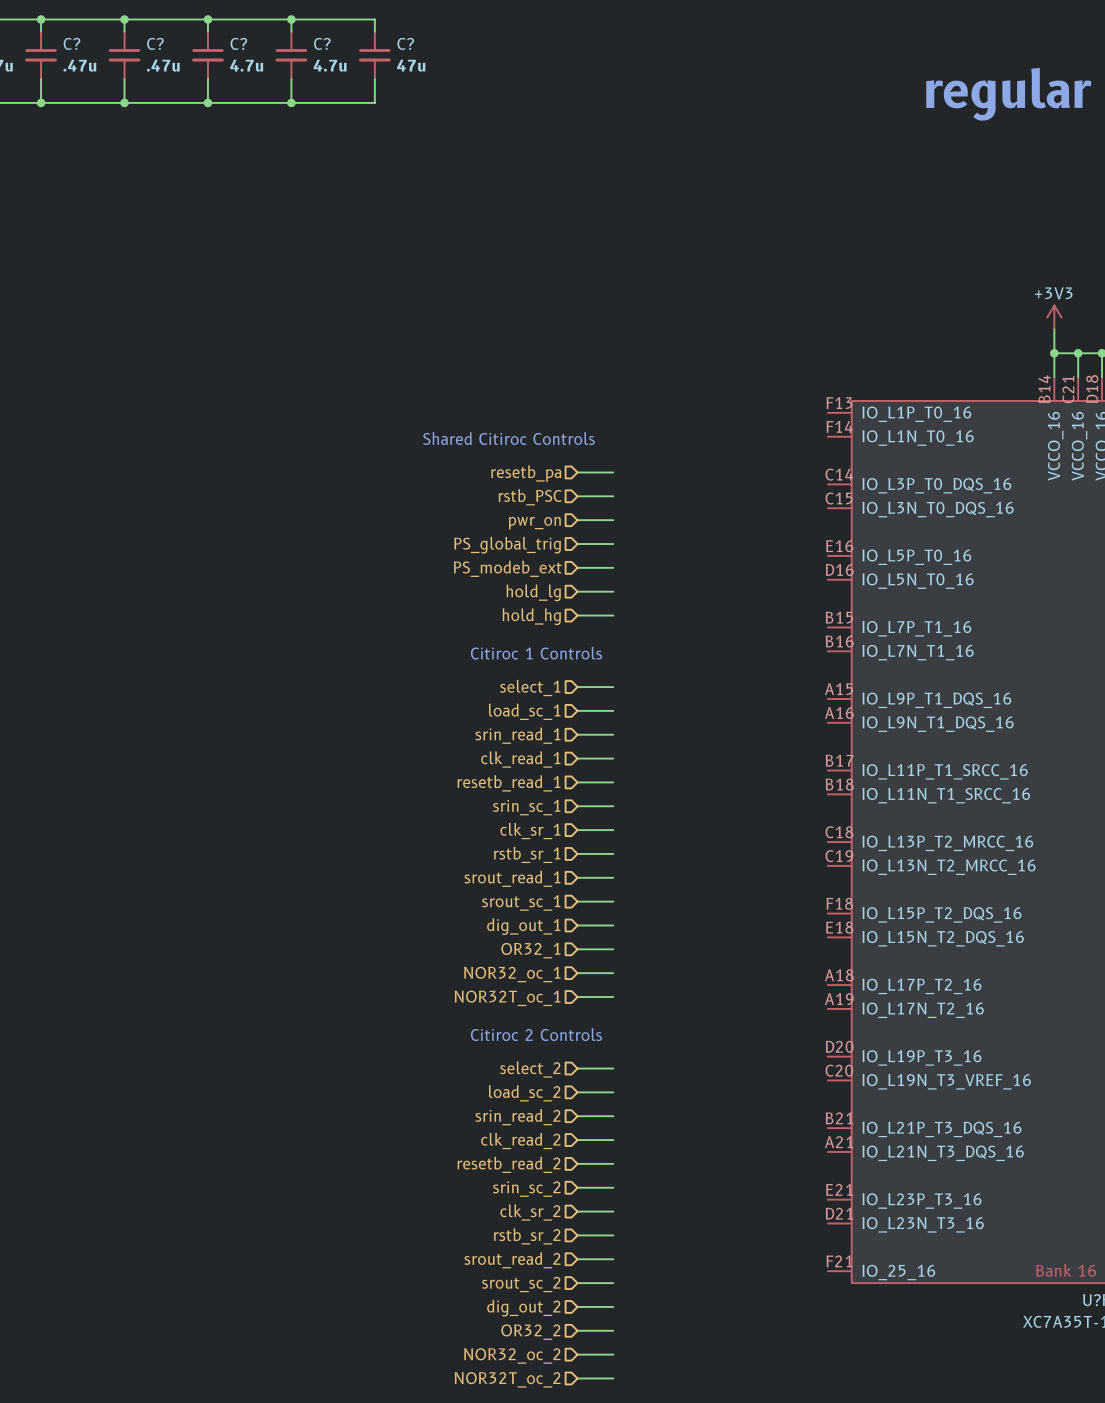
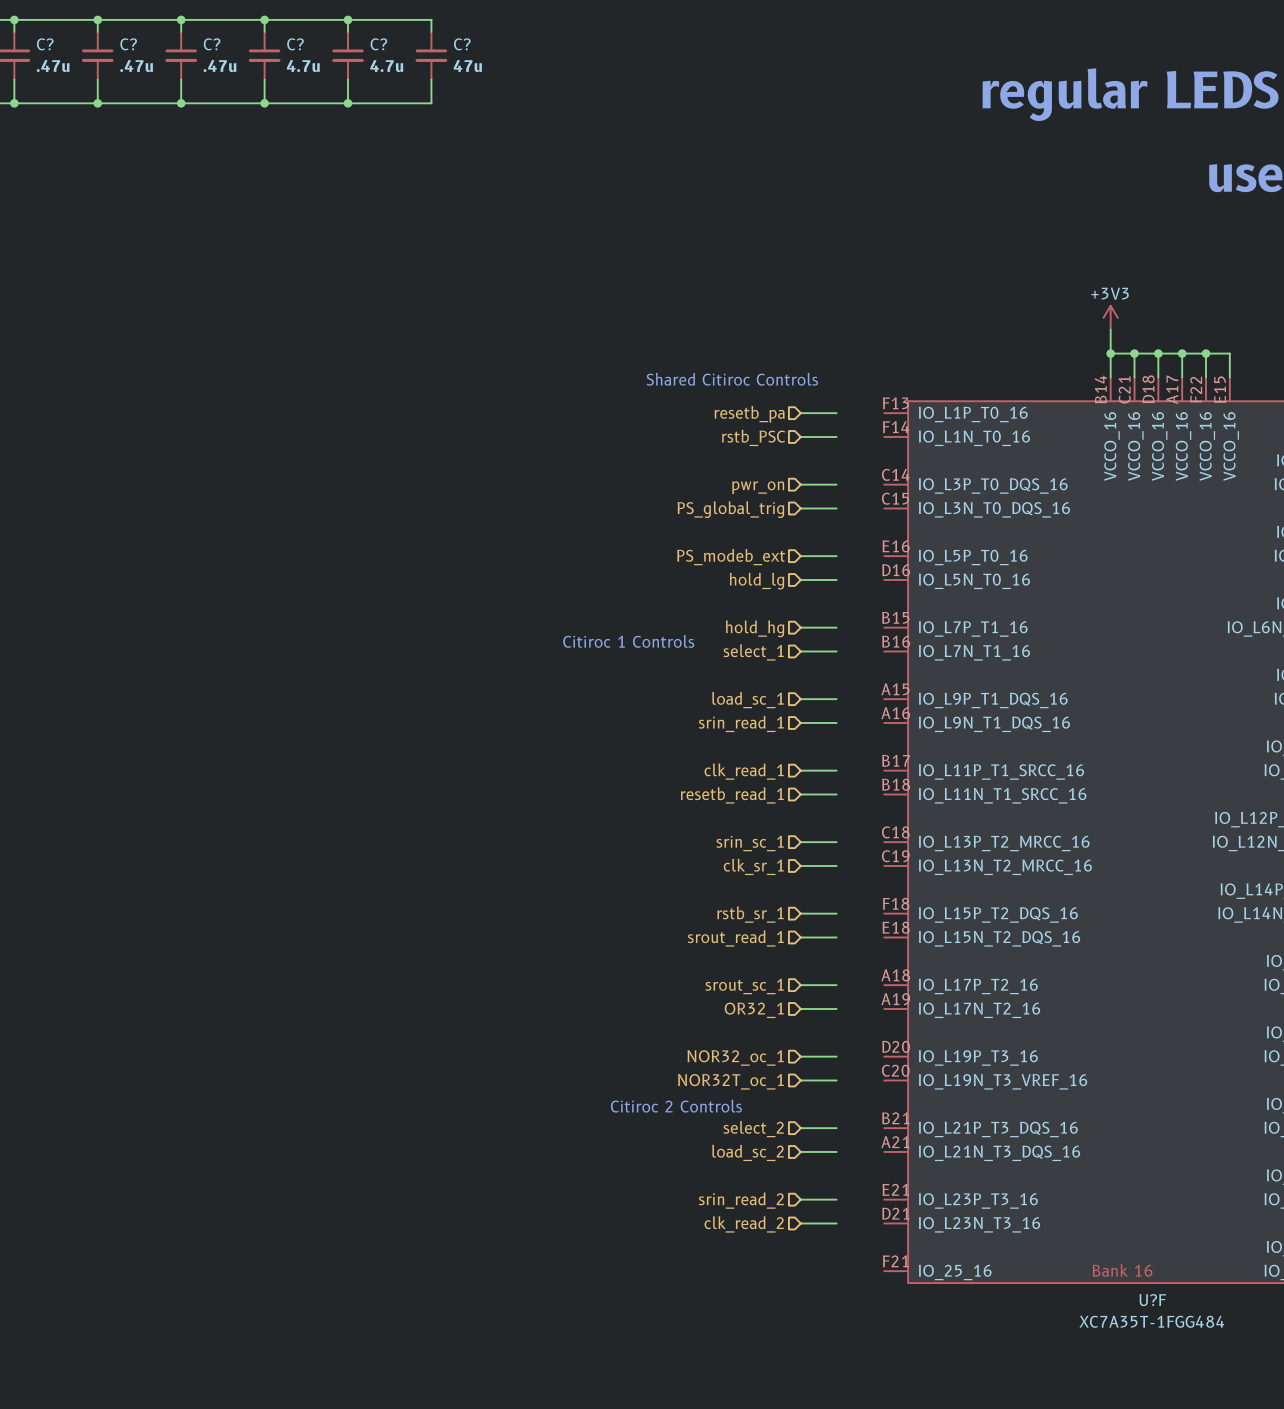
text position: Shared Citiroc Controls (508, 438) -> Shared Citiroc Controls (732, 379)
wire: (577, 472) (613, 472) -> (800, 413) (836, 413)
hierarchical label position: resetb_pa (526, 473) -> resetb_pa (749, 414)
wire: (577, 496) (613, 496) -> (800, 436) (836, 436)
hierarchical label position: rstb_PSC (530, 497) -> rstb_PSC (753, 437)
wire: (577, 520) (613, 520) -> none
hierarchical label position: pwr_on (534, 523) -> pwr_on (758, 487)
wire: (577, 544) (613, 544) -> (800, 484) (836, 484)
hierarchical label position: PS_global_trig (507, 545) -> PS_global_trig (730, 509)
wire: (577, 567) (613, 567) -> (800, 508) (836, 508)
hierarchical label position: PS_modeb_ext (507, 568) -> PS_modeb_ext (731, 557)
wire: (577, 591) (613, 591) -> none
hierarchical label position: hold_lg (533, 592) -> hold_lg (757, 581)
wire: (577, 615) (613, 615) -> (800, 556) (836, 556)
hierarchical label position: hold_hg (531, 616) -> hold_hg (755, 628)
text position: Citiroc 1 Controls (536, 653) -> Citiroc 1 Controls (628, 641)
wire: (577, 687) (613, 687) -> (800, 627) (836, 627)
hierarchical label position: select_1 (530, 688) -> select_1 (753, 652)
wire: (577, 710) (613, 710) -> (800, 651) (836, 651)
hierarchical label position: load_sc_1 (524, 711) -> load_sc_1 (748, 700)
wire: (577, 734) (613, 734) -> (800, 579) (836, 579)
hierarchical label position: srin_read_1 (517, 735) -> srin_read_1 (741, 723)
wire: (577, 758) (613, 758) -> (800, 699) (836, 699)
hierarchical label position: clk_read_1 (520, 759) -> clk_read_1 (744, 771)
wire: (577, 782) (613, 782) -> (800, 722) (836, 722)
hierarchical label position: resetb_read_1 (509, 783) -> resetb_read_1 (732, 795)
wire: (577, 806) (613, 806) -> none
hierarchical label position: srin_sc_1 (526, 807) -> srin_sc_1 (750, 843)
wire: (577, 830) (613, 830) -> (800, 770) (836, 770)
hierarchical label position: clk_sr_1 (530, 831) -> clk_sr_1 (753, 866)
wire: (577, 853) (613, 853) -> (800, 794) (836, 794)
hierarchical label position: rstb_sr_1 (527, 854) -> rstb_sr_1 (750, 914)
wire: (577, 877) (613, 877) -> none
hierarchical label position: srout_read_1 (512, 878) -> srout_read_1 (735, 938)
wire: (577, 901) (613, 901) -> (800, 842) (836, 842)
hierarchical label position: srout_sc_1 (521, 902) -> srout_sc_1 (744, 986)
wire: (577, 925) (613, 925) -> (800, 865) (836, 865)
hierarchical label: dig_out_1 (523, 926) -> none
wire: (577, 949) (613, 949) -> none
hierarchical label position: OR32_1 (530, 950) -> OR32_1 (754, 1010)
wire: (577, 973) (613, 973) -> (800, 913) (836, 913)
hierarchical label position: NOR32_oc_1 (512, 974) -> NOR32_oc_1 (735, 1057)
wire: (577, 997) (613, 997) -> (800, 937) (836, 937)
hierarchical label position: NOR32T_oc_1 (507, 998) -> NOR32T_oc_1 (730, 1081)
text position: Citiroc 2 Controls (536, 1034) -> Citiroc 2 Controls (676, 1106)
wire: (577, 1068) (613, 1068) -> (800, 1008) (836, 1008)
hierarchical label position: select_2 (530, 1069) -> select_2 (753, 1129)
wire: (577, 1092) (613, 1092) -> (800, 985) (836, 985)
hierarchical label position: load_sc_2 (524, 1093) -> load_sc_2 (748, 1152)
wire: (577, 1116) (613, 1116) -> (800, 1056) (836, 1056)
hierarchical label position: srin_read_2 (517, 1117) -> srin_read_2 (741, 1200)
wire: (577, 1140) (613, 1140) -> (800, 1080) (836, 1080)
hierarchical label position: clk_read_2 (520, 1141) -> clk_read_2 (744, 1224)
wire: (577, 1163) (613, 1163) -> none
hierarchical label: resetb_read_2 (509, 1164) -> none
wire: (577, 1187) (613, 1187) -> (800, 1128) (836, 1128)
hierarchical label: srin_sc_2 (526, 1189) -> none
wire: (577, 1211) (613, 1211) -> (800, 1151) (836, 1151)
hierarchical label: clk_sr_2 (530, 1212) -> none
wire: (577, 1235) (613, 1235) -> none
hierarchical label: rstb_sr_2 (527, 1236) -> none
wire: (577, 1259) (613, 1259) -> (800, 1199) (836, 1199)
hierarchical label: srout_read_2 (512, 1260) -> none
wire: (577, 1283) (613, 1283) -> (800, 1223) (836, 1223)
hierarchical label: srout_sc_2 (521, 1284) -> none
wire: (577, 1306) (613, 1306) -> none
hierarchical label: dig_out_2 (523, 1308) -> none
wire: (577, 1330) (613, 1330) -> none
hierarchical label: OR32_2 (530, 1332) -> none
wire: (577, 1354) (613, 1354) -> none
hierarchical label: NOR32_oc_2 (512, 1355) -> none
wire: (577, 1378) (613, 1378) -> none
hierarchical label: NOR32T_oc_2 (507, 1379) -> none

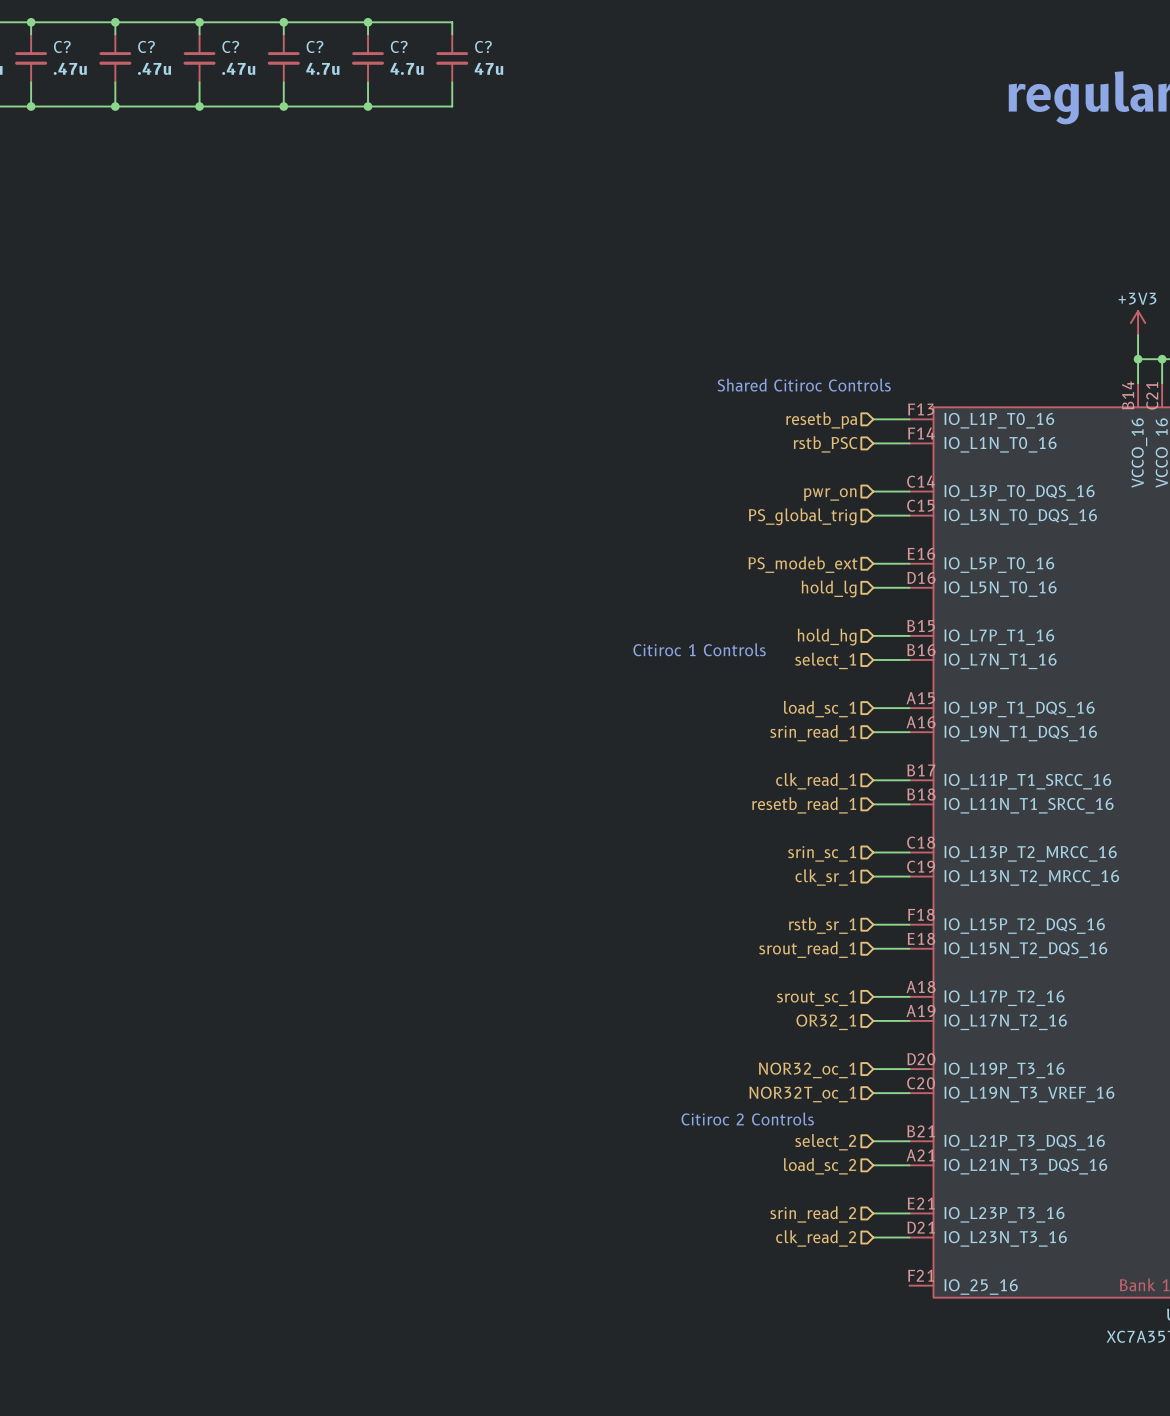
text position: Shared Citiroc Controls (732, 379) -> Shared Citiroc Controls (804, 385)
wire: (800, 413) (836, 413) -> (873, 419) (909, 419)
hierarchical label position: resetb_pa (749, 414) -> resetb_pa (821, 420)
wire: (800, 436) (836, 436) -> (873, 443) (909, 443)
hierarchical label position: rstb_PSC (753, 437) -> rstb_PSC (825, 444)
wire: (800, 484) (836, 484) -> (873, 491) (909, 491)
hierarchical label position: pwr_on (758, 487) -> pwr_on (830, 494)
wire: (800, 508) (836, 508) -> (873, 515) (909, 515)
hierarchical label position: PS_global_trig (730, 509) -> PS_global_trig (802, 516)
wire: (800, 556) (836, 556) -> (873, 563) (909, 563)
hierarchical label position: PS_modeb_ext (731, 557) -> PS_modeb_ext (802, 564)
wire: (800, 579) (836, 579) -> (873, 587) (909, 587)
hierarchical label position: hold_lg (757, 581) -> hold_lg (829, 588)
wire: (800, 627) (836, 627) -> (873, 635) (909, 635)
hierarchical label position: hold_hg (755, 628) -> hold_hg (827, 637)
text position: Citiroc 1 Controls (628, 641) -> Citiroc 1 Controls (699, 649)
wire: (800, 651) (836, 651) -> (873, 659) (909, 659)
hierarchical label position: select_1 (753, 652) -> select_1 (825, 660)
wire: (800, 699) (836, 699) -> (873, 708) (909, 708)
hierarchical label position: load_sc_1 (748, 700) -> load_sc_1 (820, 709)
wire: (800, 722) (836, 722) -> (873, 732) (909, 732)
hierarchical label position: srin_read_1 (741, 723) -> srin_read_1 (813, 733)
wire: (800, 770) (836, 770) -> (873, 780) (909, 780)
hierarchical label position: clk_read_1 (744, 771) -> clk_read_1 (816, 781)
wire: (800, 794) (836, 794) -> (873, 804) (909, 804)
hierarchical label position: resetb_read_1 (732, 795) -> resetb_read_1 (804, 805)
wire: (800, 842) (836, 842) -> (873, 852) (909, 852)
hierarchical label position: srin_sc_1 (750, 843) -> srin_sc_1 (822, 853)
wire: (800, 865) (836, 865) -> (873, 876) (909, 876)
hierarchical label position: clk_sr_1 (753, 866) -> clk_sr_1 (825, 877)
wire: (800, 913) (836, 913) -> (873, 924) (909, 924)
hierarchical label position: rstb_sr_1 (750, 914) -> rstb_sr_1 (822, 925)
wire: (800, 937) (836, 937) -> (873, 948) (909, 948)
hierarchical label position: srout_read_1 (735, 938) -> srout_read_1 (807, 949)
wire: (800, 985) (836, 985) -> (873, 996) (909, 996)
hierarchical label position: srout_sc_1 (744, 986) -> srout_sc_1 (816, 998)
wire: (800, 1008) (836, 1008) -> (873, 1020) (909, 1020)
hierarchical label position: OR32_1 (754, 1010) -> OR32_1 (826, 1022)
wire: (800, 1056) (836, 1056) -> (873, 1069) (909, 1069)
hierarchical label position: NOR32_oc_1 (735, 1057) -> NOR32_oc_1 (807, 1070)
wire: (800, 1080) (836, 1080) -> (873, 1093) (909, 1093)
hierarchical label position: NOR32T_oc_1 (730, 1081) -> NOR32T_oc_1 (802, 1094)
text position: Citiroc 2 Controls (676, 1106) -> Citiroc 2 Controls (747, 1119)
wire: (800, 1128) (836, 1128) -> (873, 1141) (909, 1141)
hierarchical label position: select_2 (753, 1129) -> select_2 (825, 1142)
wire: (800, 1151) (836, 1151) -> (873, 1165) (909, 1165)
hierarchical label position: load_sc_2 (748, 1152) -> load_sc_2 (820, 1166)
wire: (800, 1199) (836, 1199) -> (873, 1213) (909, 1213)
hierarchical label position: srin_read_2 (741, 1200) -> srin_read_2 (813, 1214)
wire: (800, 1223) (836, 1223) -> (873, 1237) (909, 1237)
hierarchical label position: clk_read_2 (744, 1224) -> clk_read_2 (816, 1238)

